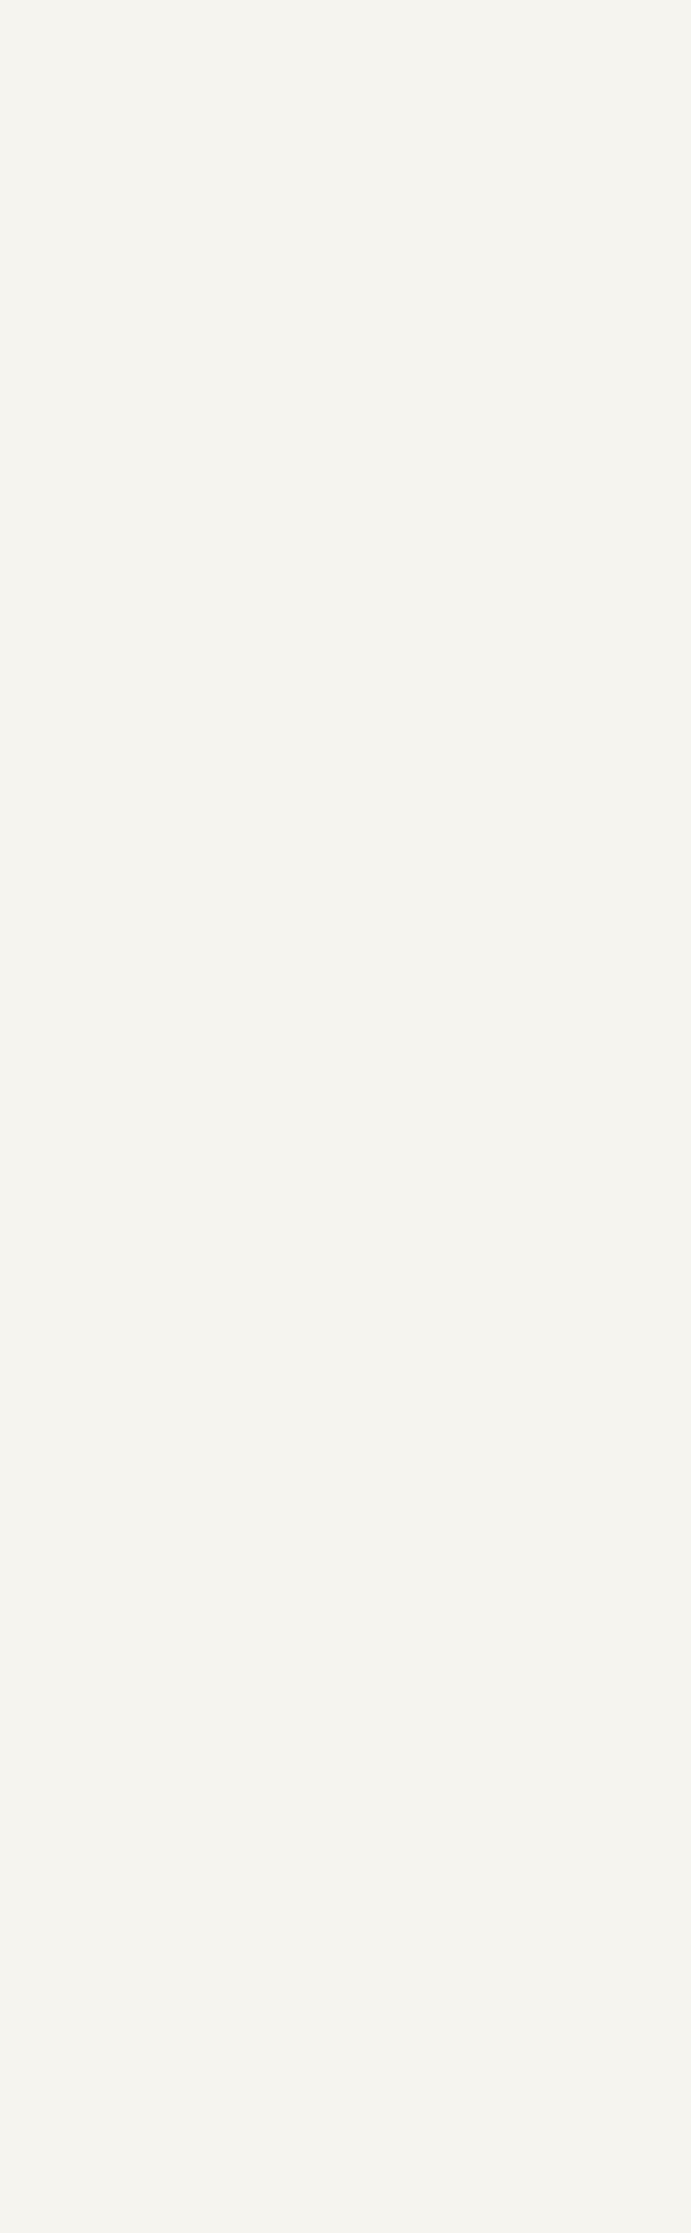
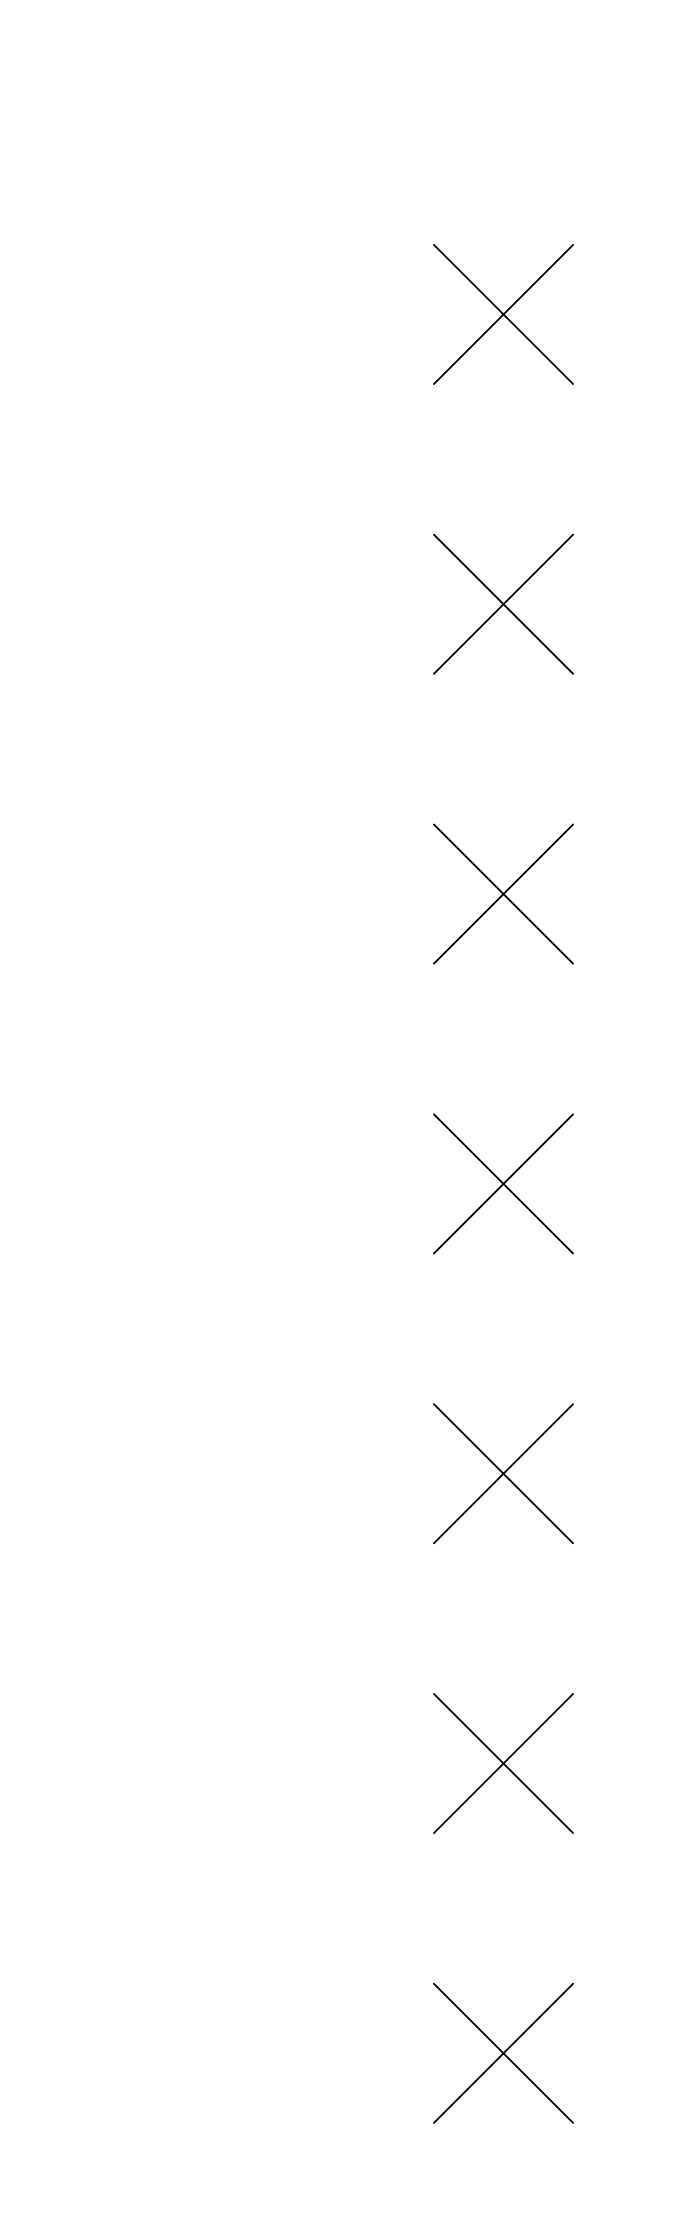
no-connect mark: none -> (503, 314)
no-connect mark: none -> (503, 604)
no-connect mark: none -> (503, 894)
no-connect mark: none -> (503, 1183)
no-connect mark: none -> (503, 1473)
no-connect mark: none -> (503, 1763)
no-connect mark: none -> (503, 2053)

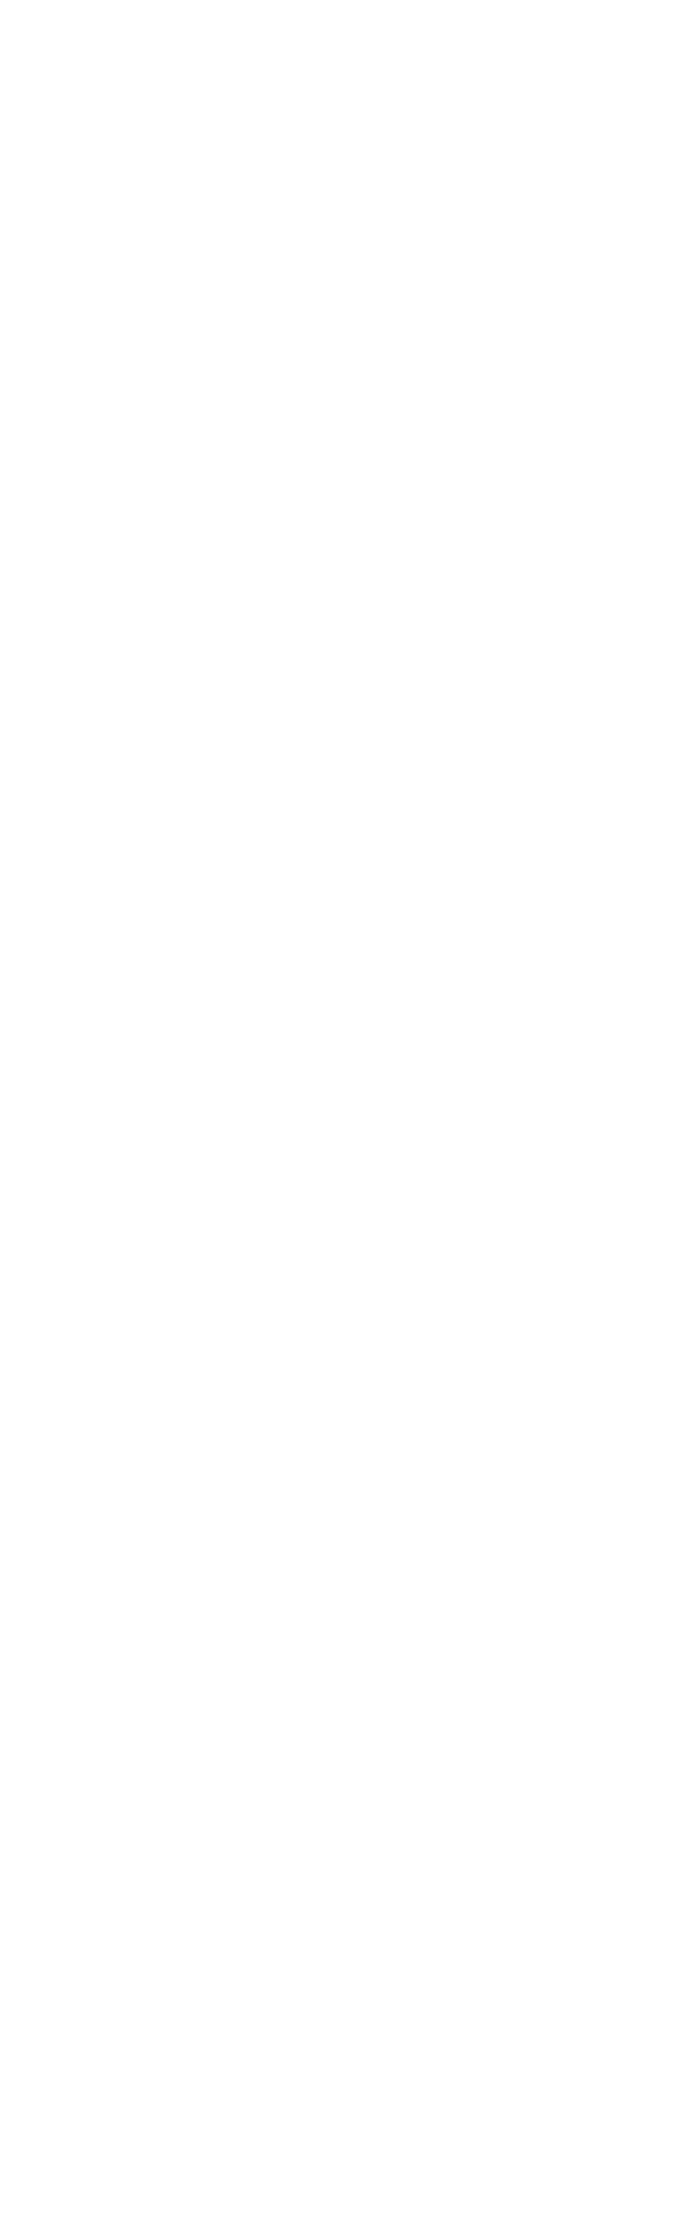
no-connect mark: (503, 314) -> none
no-connect mark: (503, 604) -> none
no-connect mark: (503, 894) -> none
no-connect mark: (503, 1183) -> none
no-connect mark: (503, 1473) -> none
no-connect mark: (503, 1763) -> none
no-connect mark: (503, 2053) -> none

